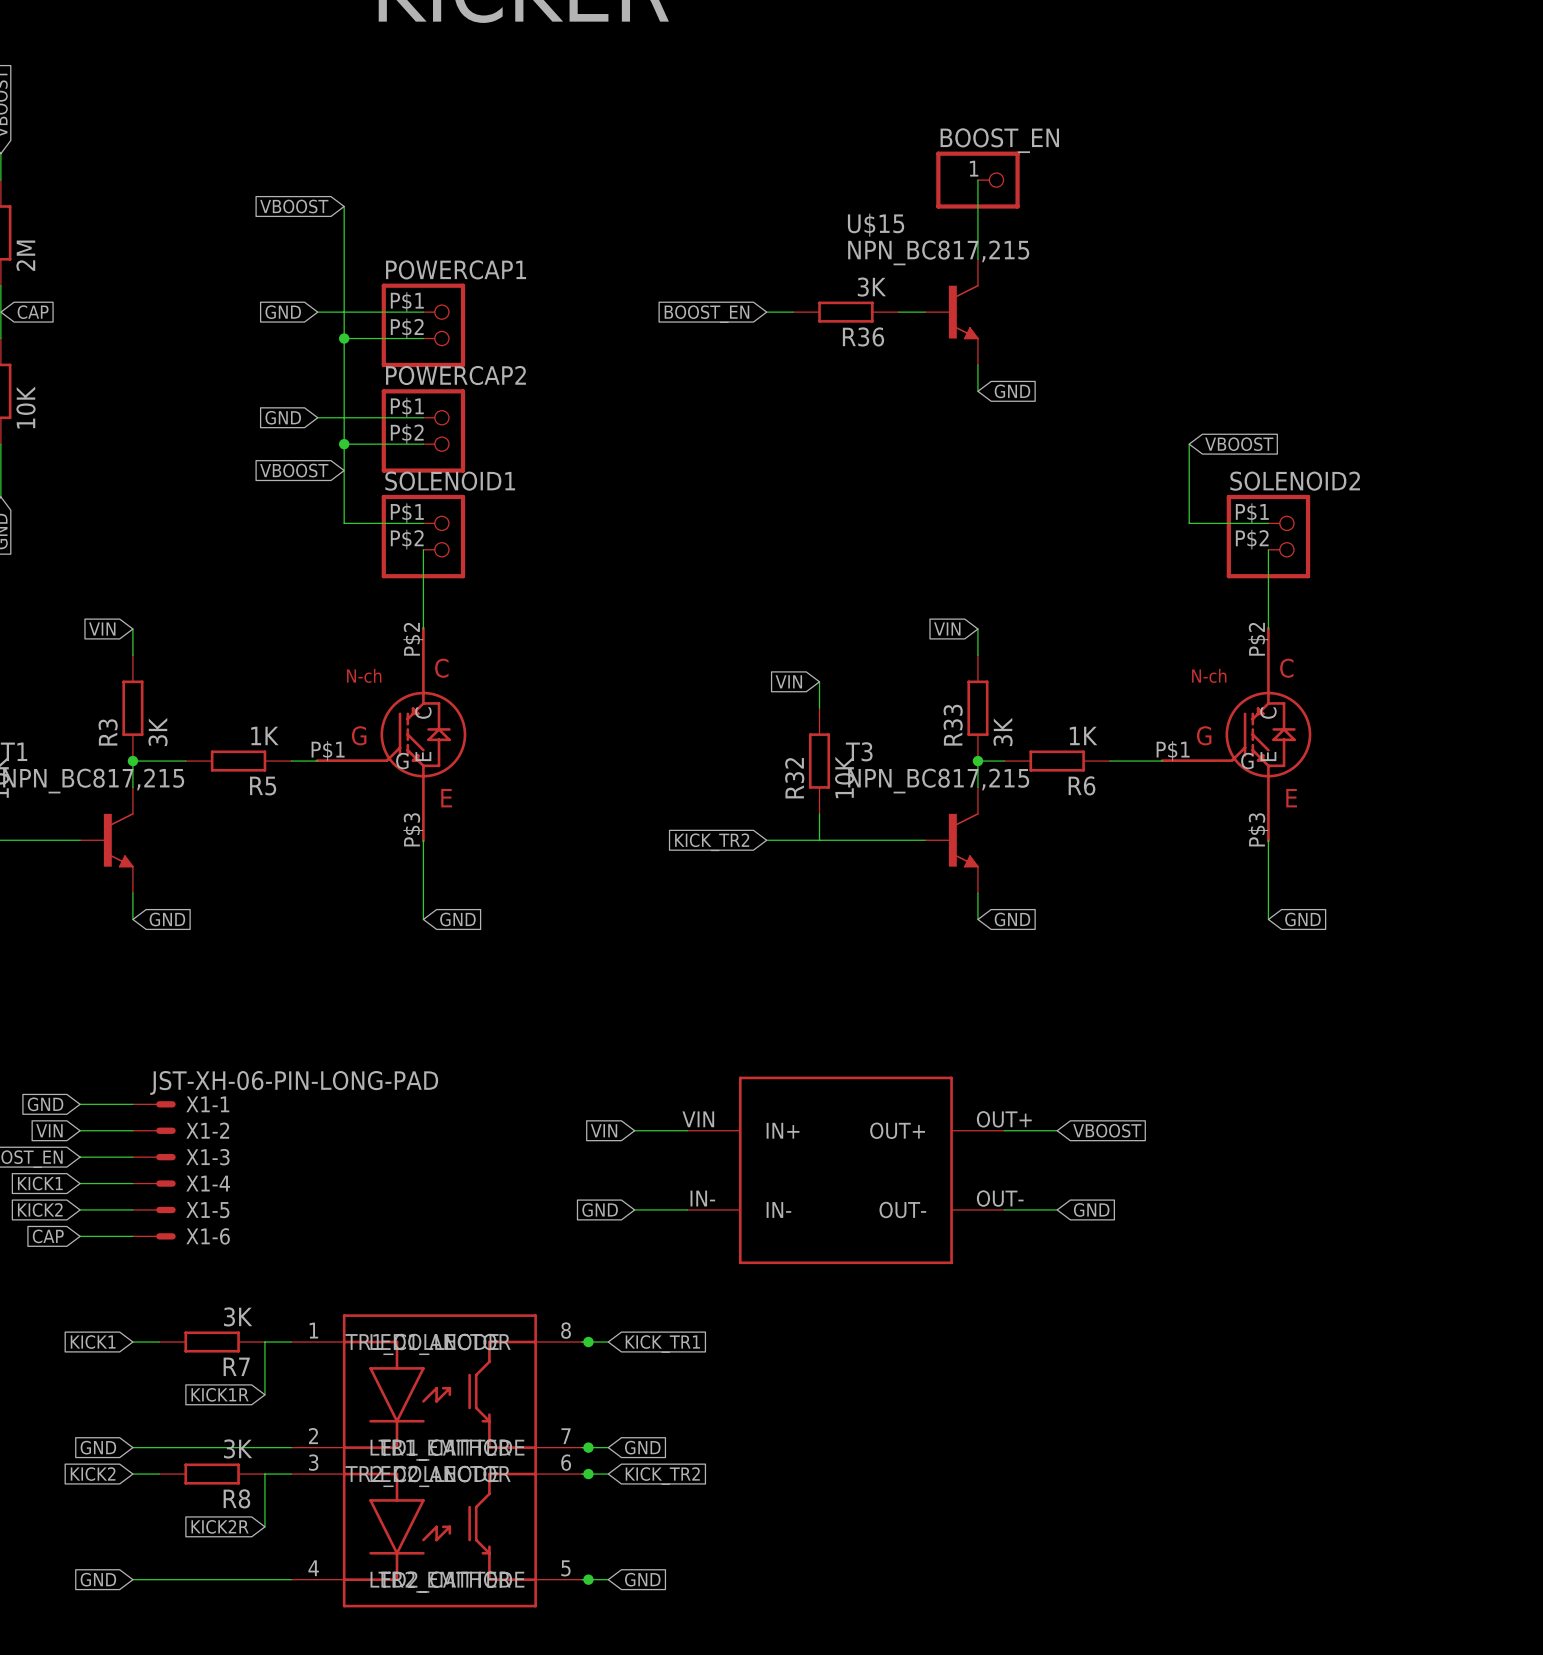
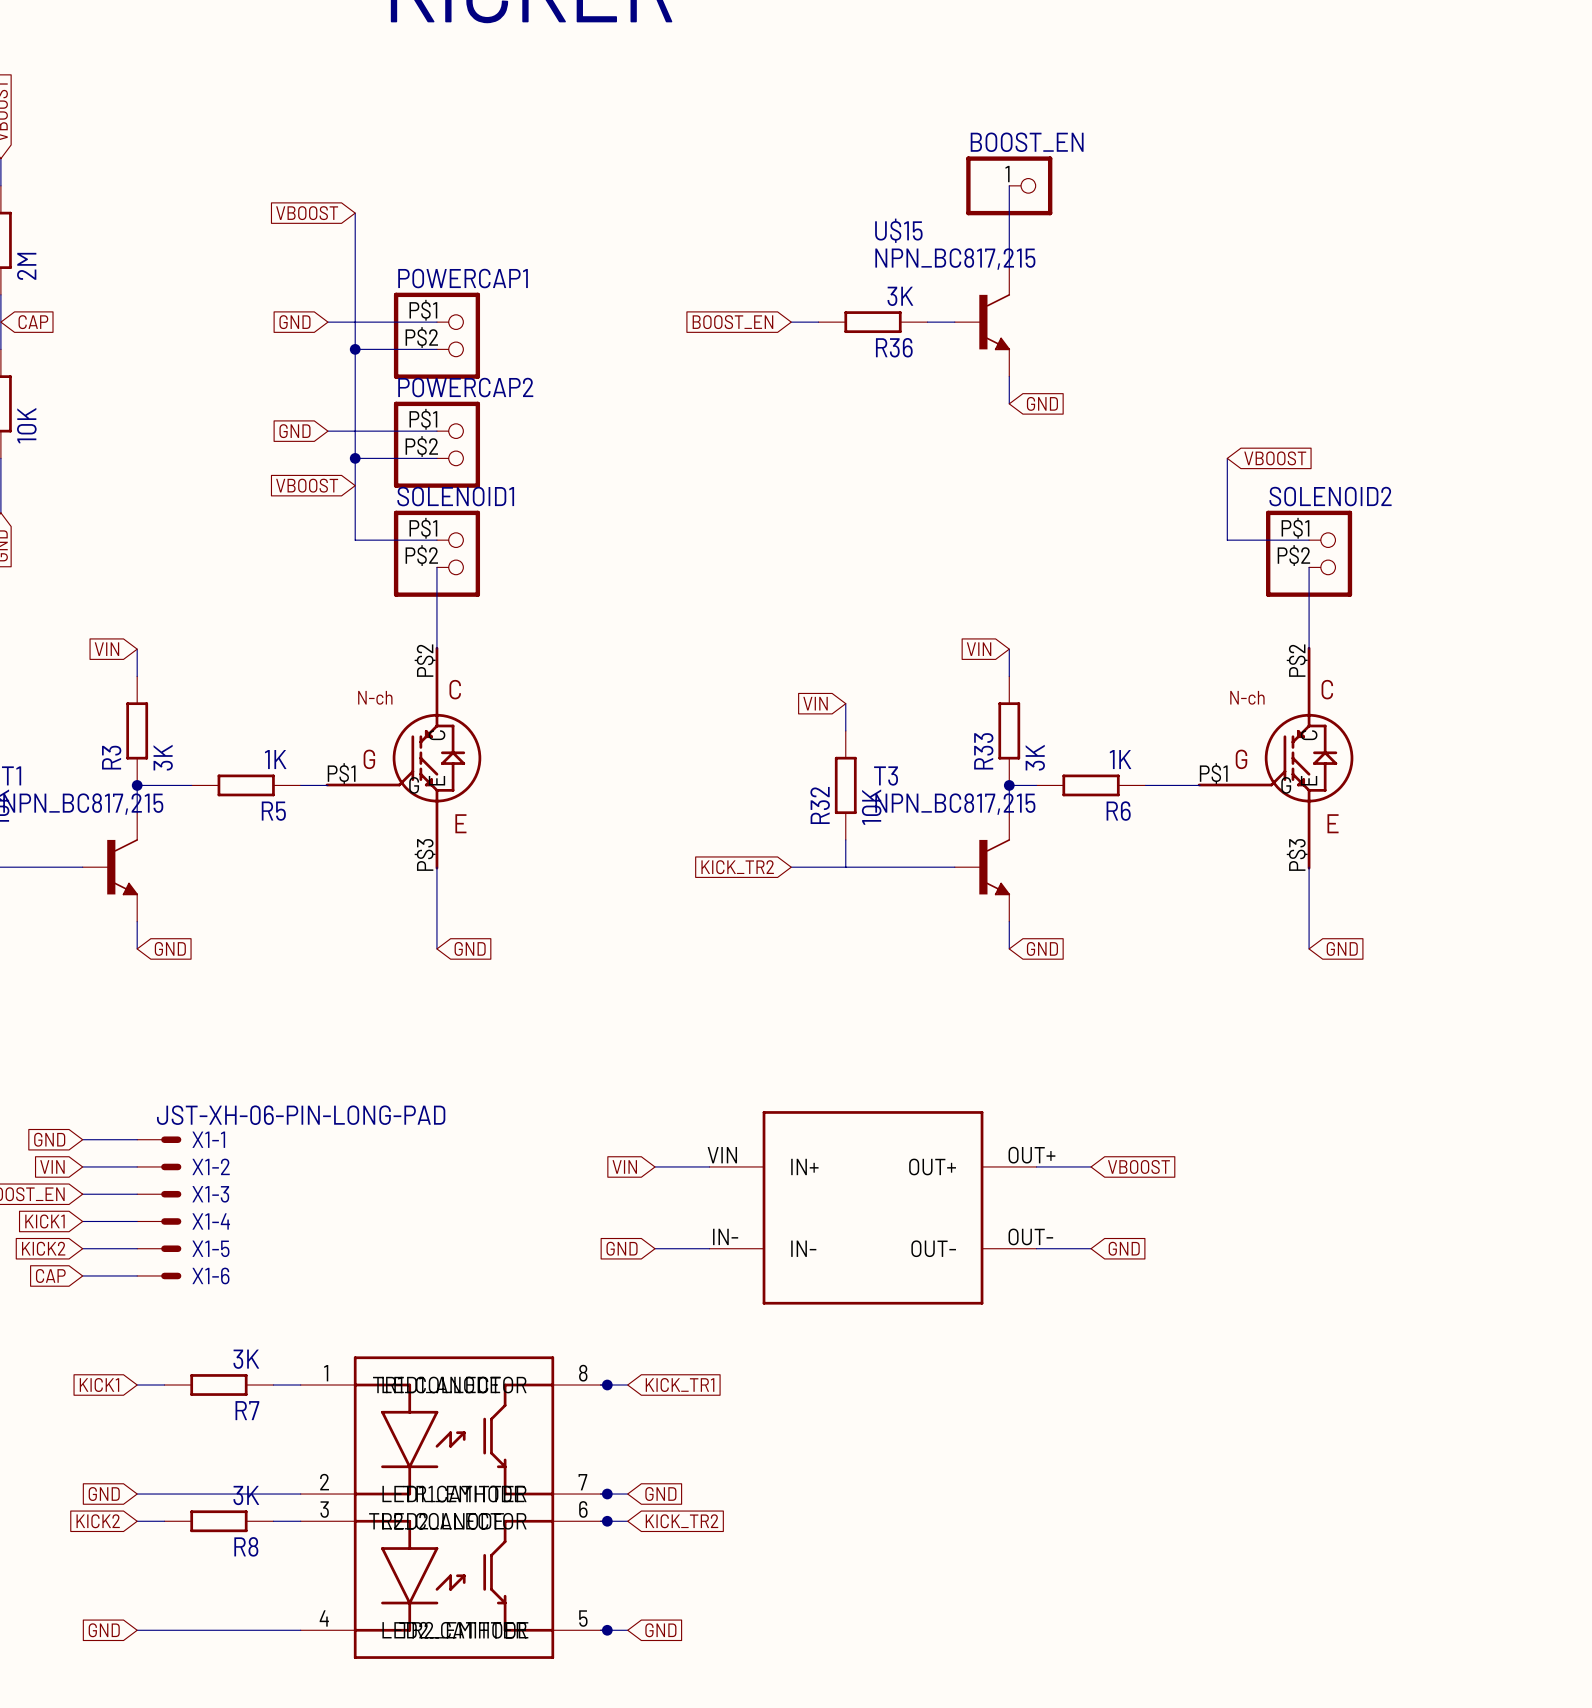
wire: (264, 1342) (264, 1394) -> none
global label: KICK1R (220, 1394) -> none
wire: (264, 1474) (264, 1526) -> none
global label: KICK2R (220, 1526) -> none

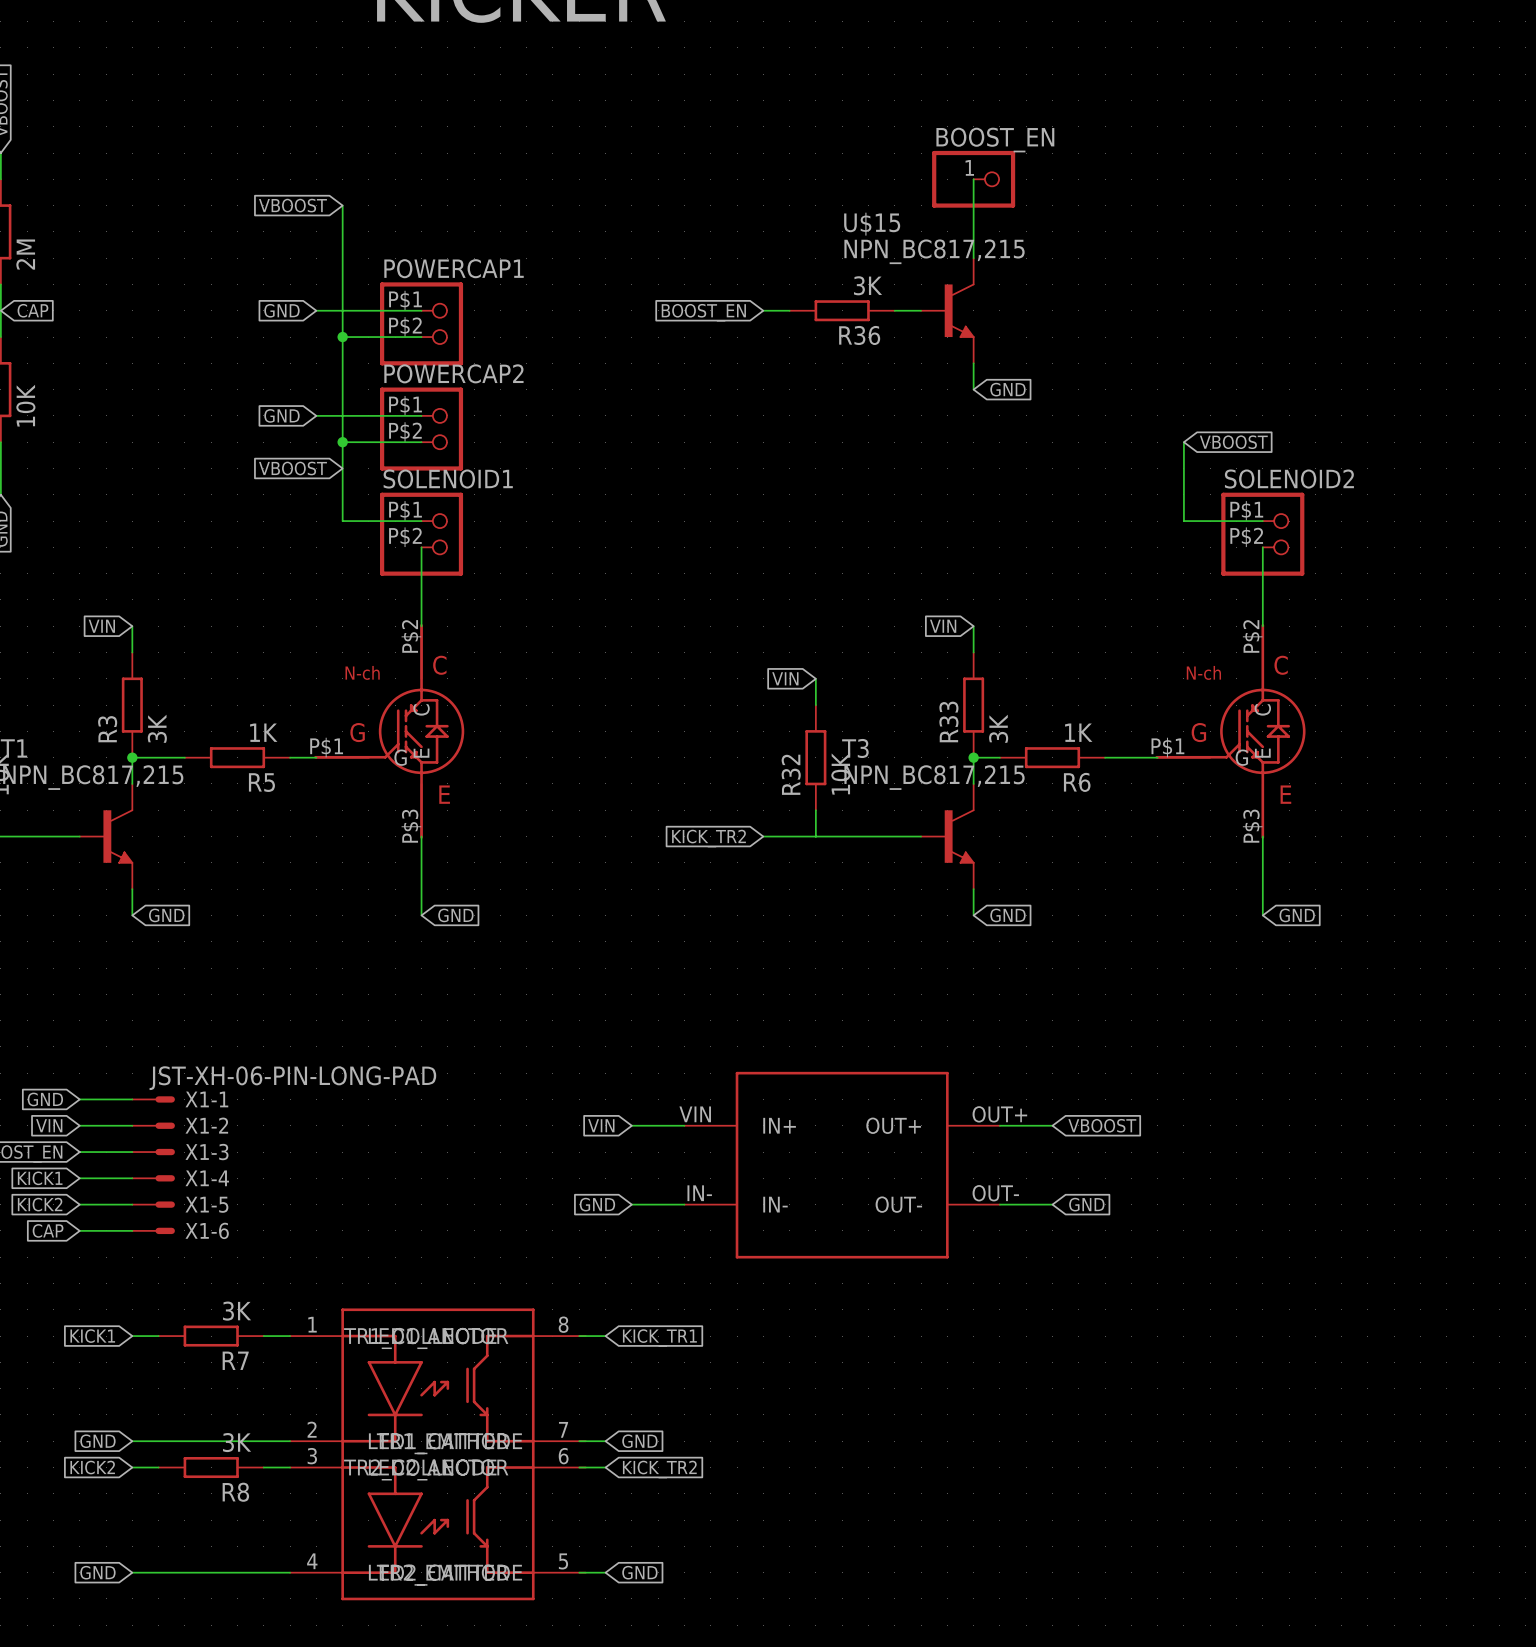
junction: (607, 1385) -> none
junction: (607, 1494) -> none
junction: (607, 1521) -> none
junction: (607, 1630) -> none

